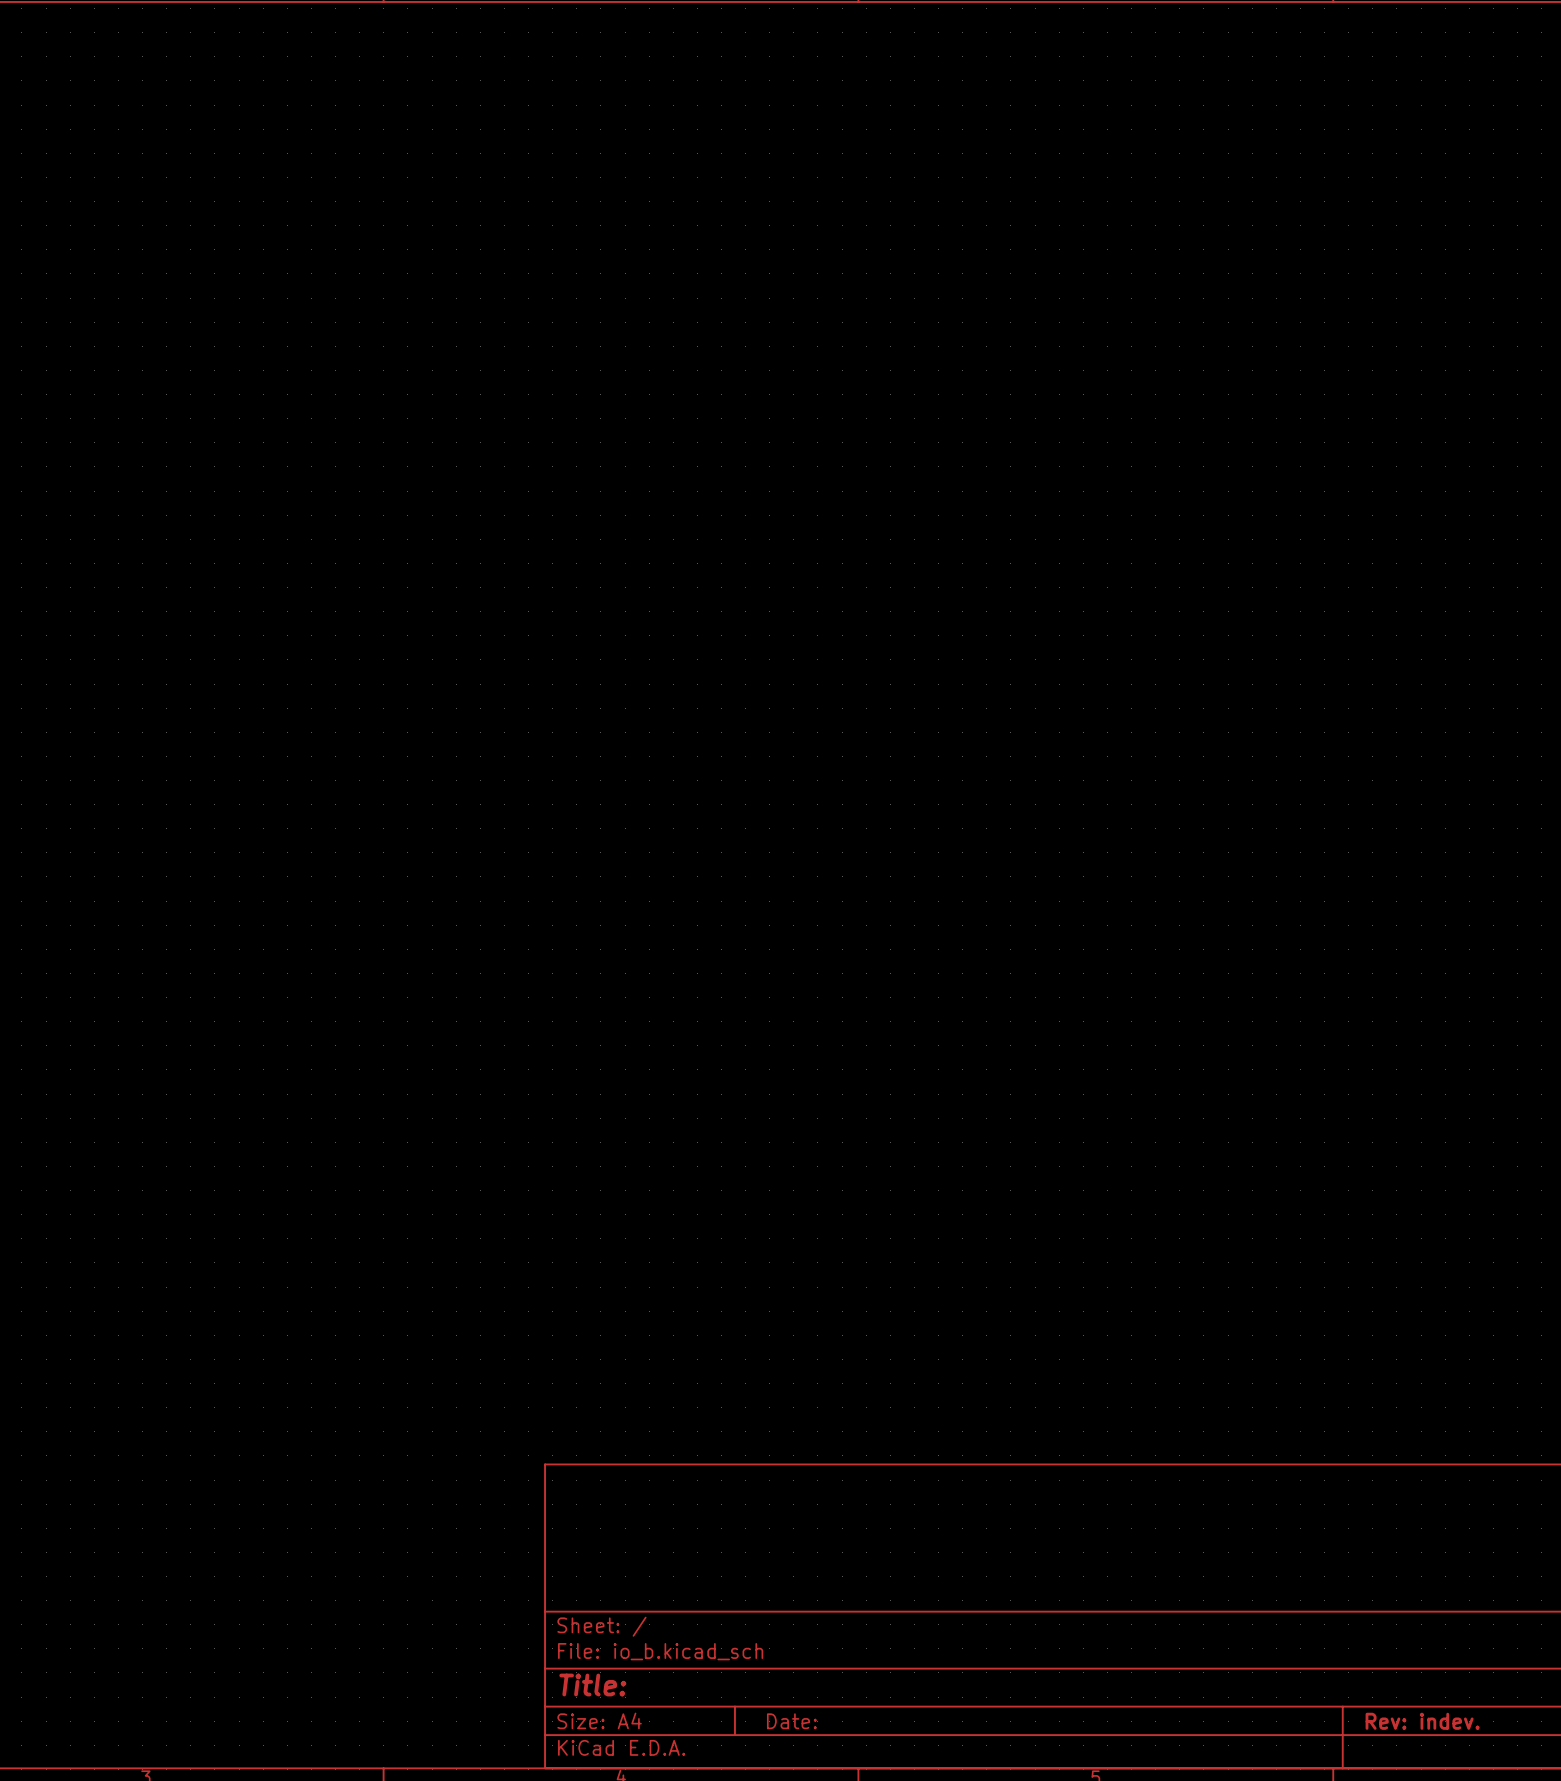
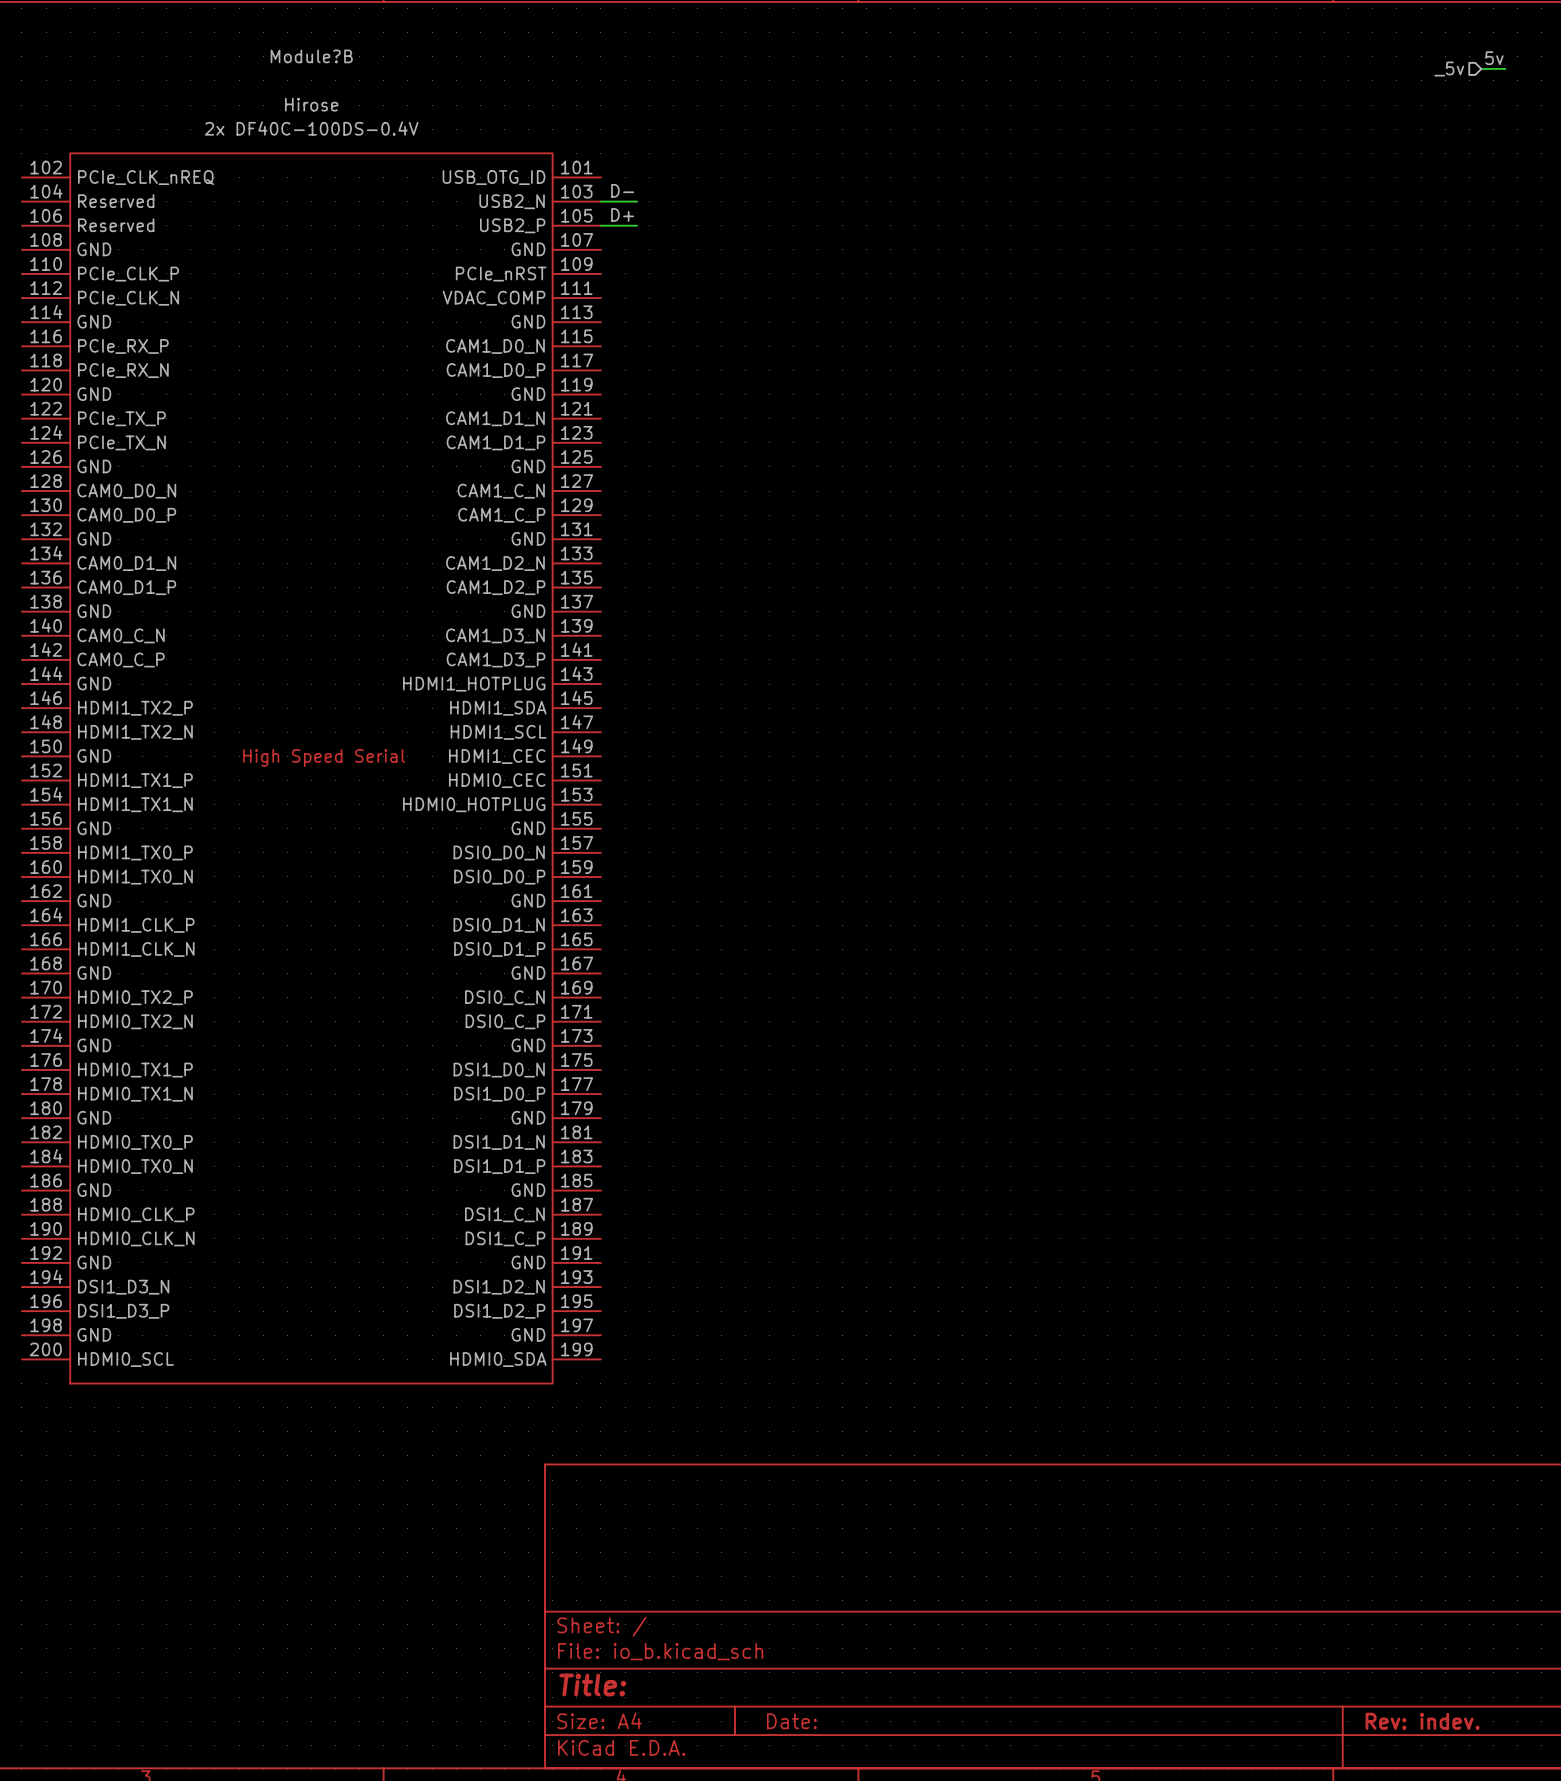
label: none -> 5v (1494, 58)
wire: none -> (1481, 68) (1505, 68)
hierarchical label: none -> _5v (1449, 69)
label: none -> D- (622, 190)
wire: none -> (600, 201) (637, 201)
label: none -> D+ (622, 214)
wire: none -> (600, 225) (637, 225)
Module?B: none -> (311, 768)

